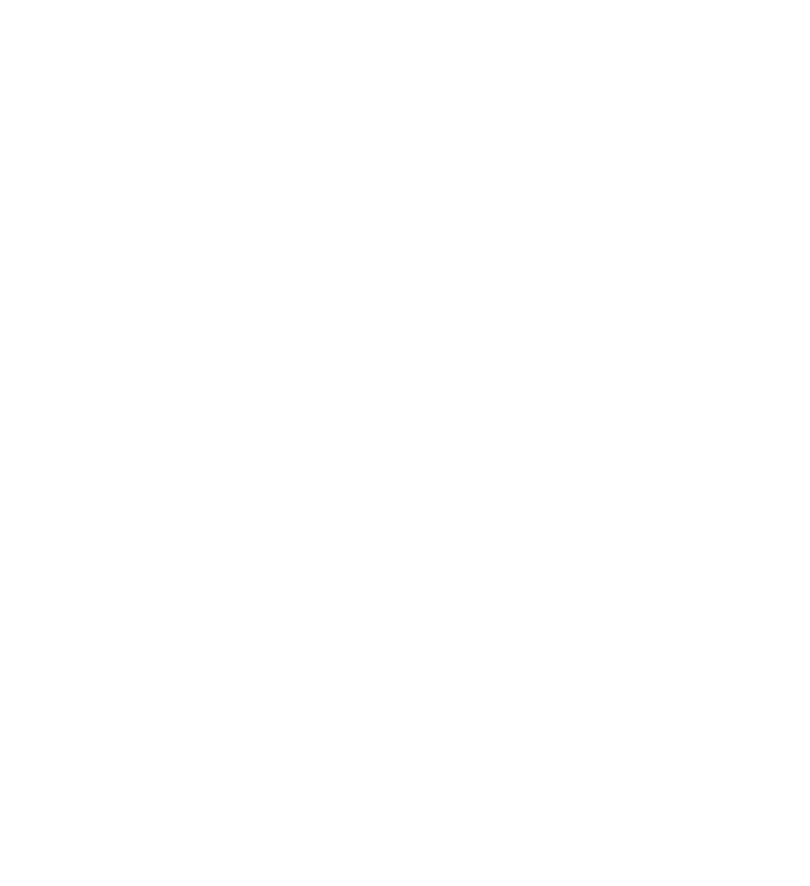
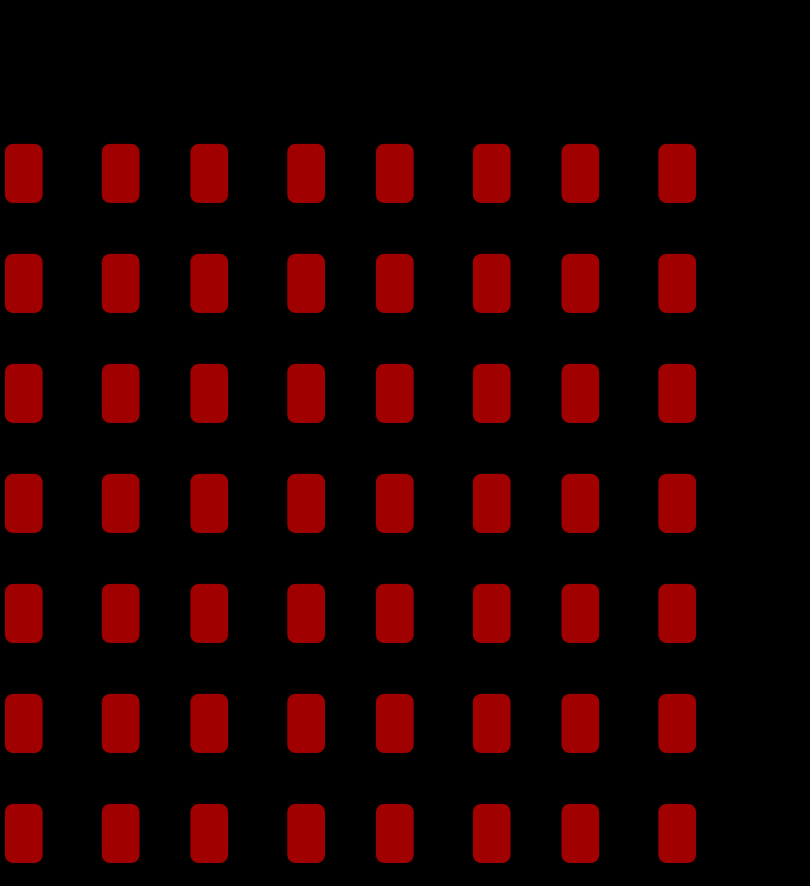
part: none -> (72, 173)
part: none -> (257, 173)
part: none -> (443, 173)
part: none -> (628, 173)
part: none -> (72, 283)
part: none -> (257, 283)
part: none -> (443, 283)
part: none -> (628, 283)
part: none -> (72, 393)
part: none -> (257, 393)
part: none -> (443, 393)
part: none -> (628, 393)
part: none -> (72, 503)
part: none -> (257, 503)
part: none -> (443, 503)
part: none -> (628, 503)
part: none -> (72, 613)
part: none -> (257, 613)
part: none -> (443, 613)
part: none -> (628, 613)
part: none -> (72, 723)
part: none -> (257, 723)
part: none -> (443, 723)
part: none -> (628, 723)
part: none -> (72, 833)
part: none -> (257, 833)
part: none -> (443, 833)
part: none -> (628, 833)

